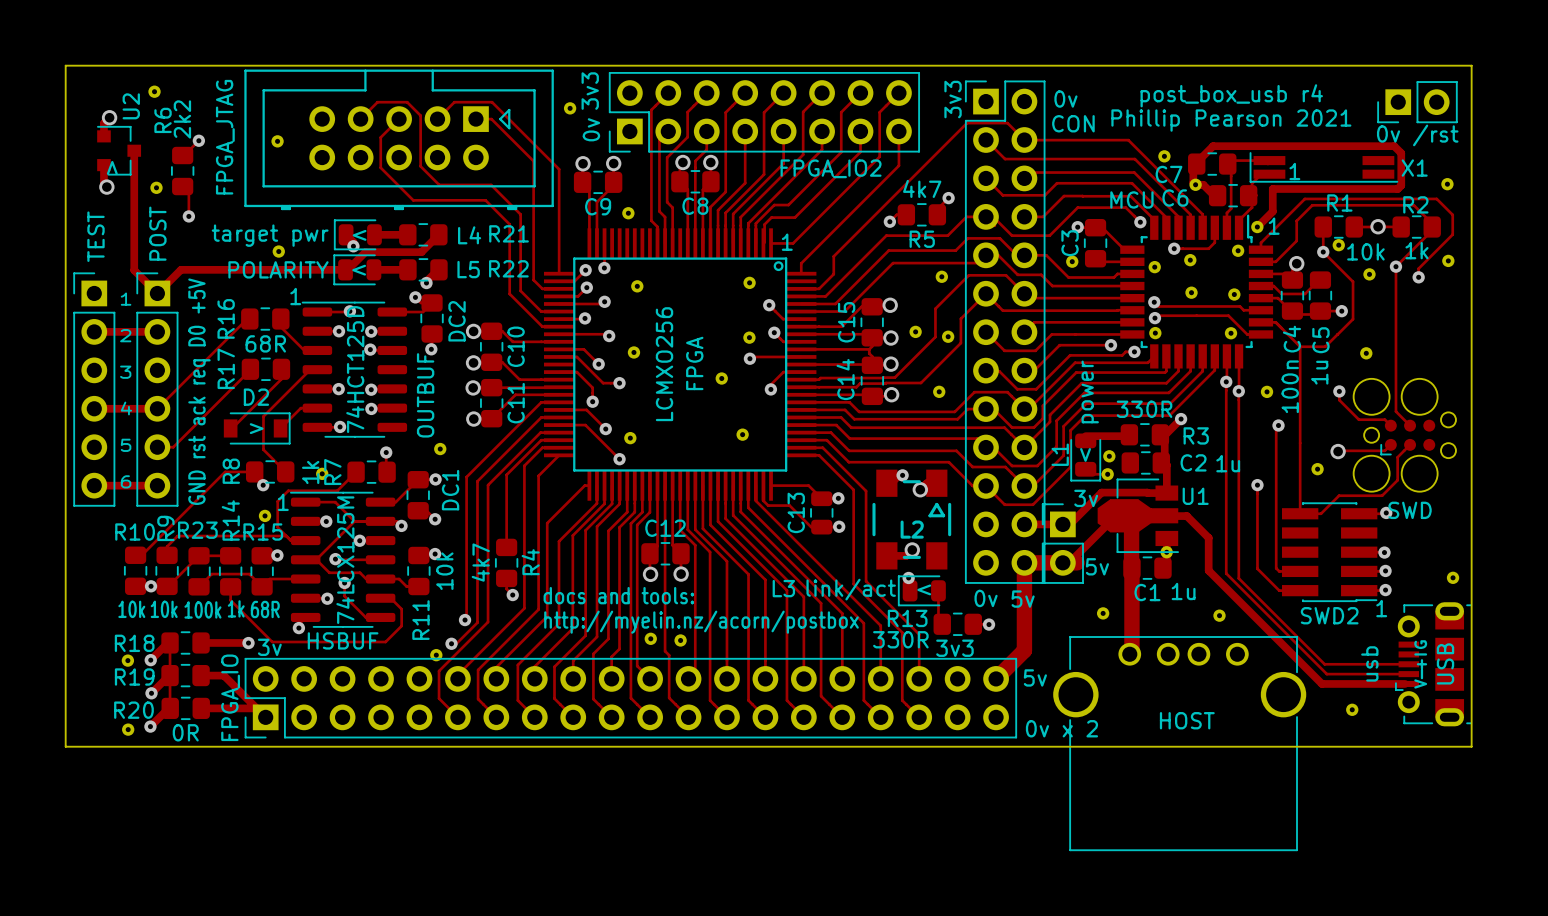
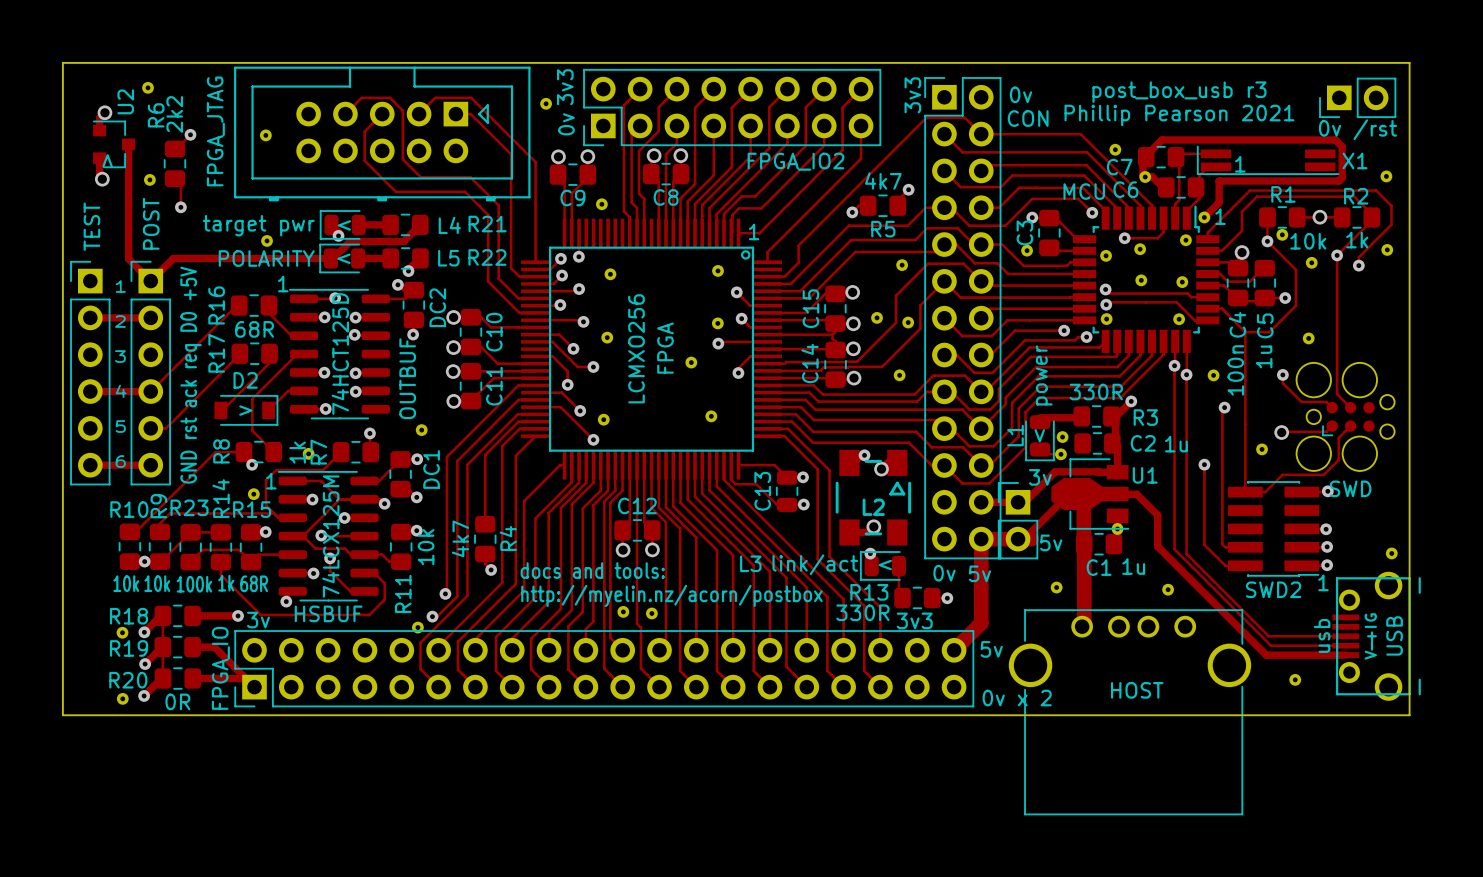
text: post_box_usb r4 (1231, 95) -> post_box_usb r3 (1179, 92)
USB footprint: [1395, 602, 1472, 727] -> [1332, 571, 1421, 701]

